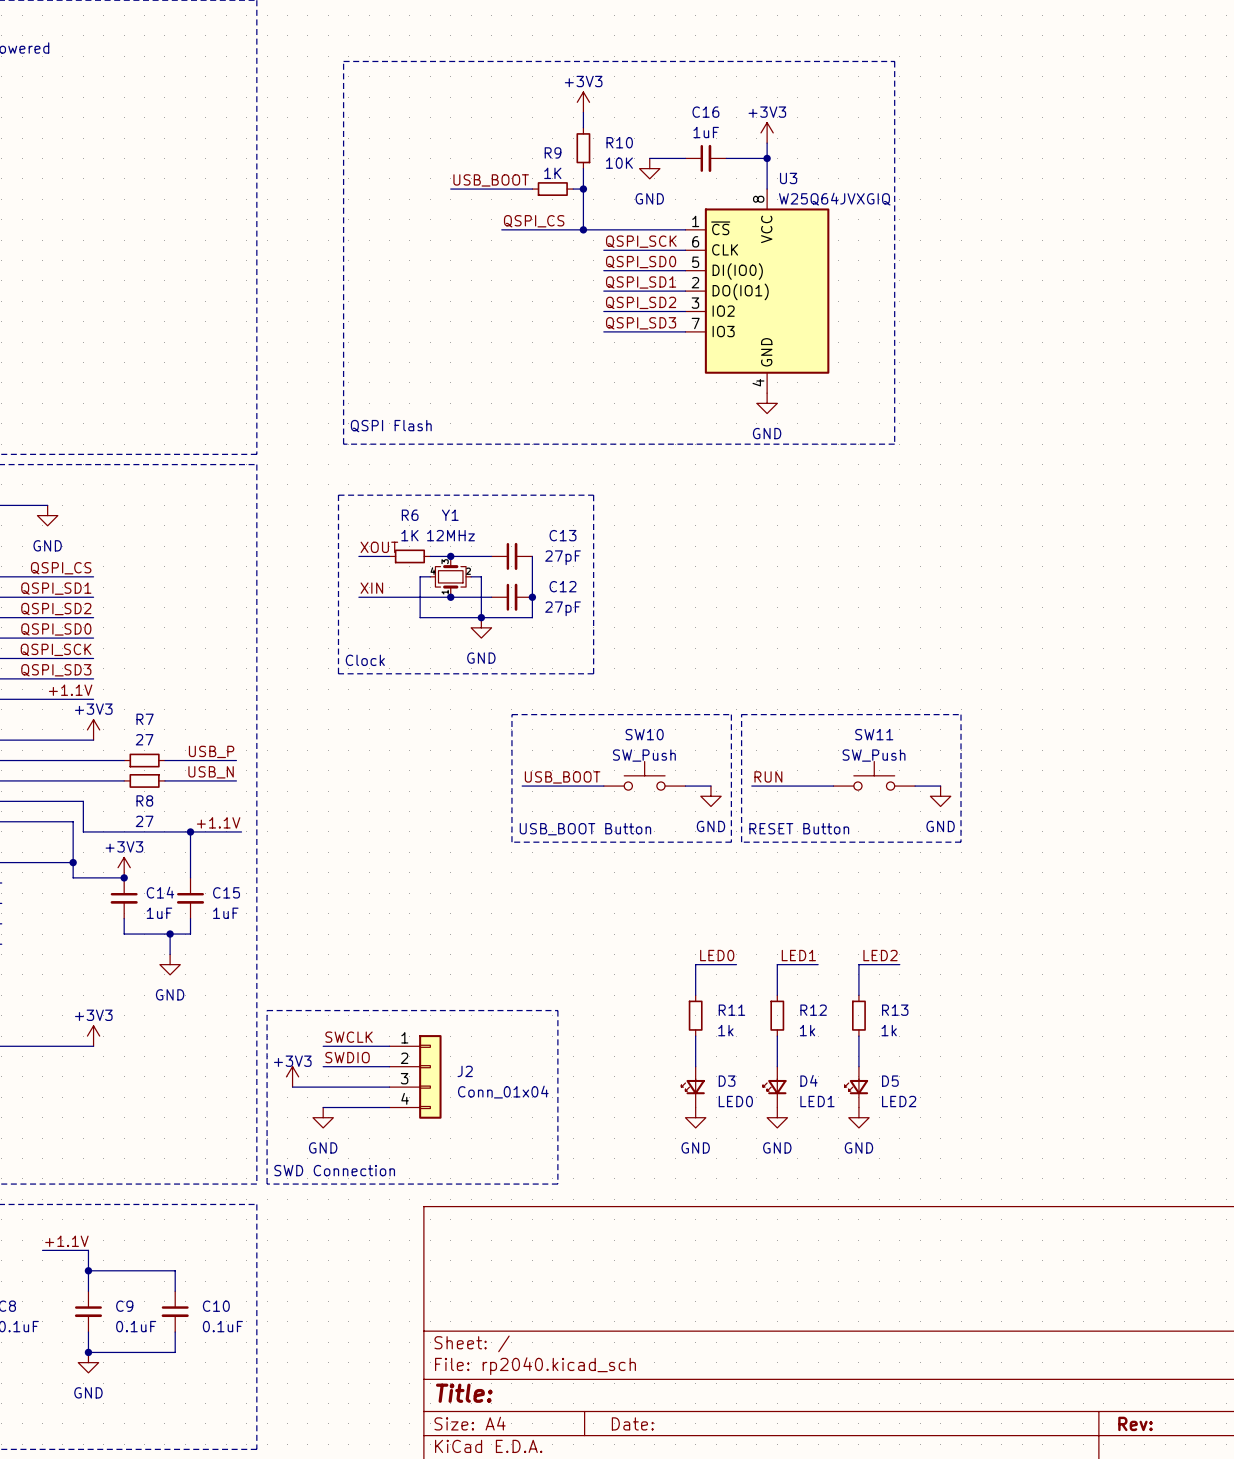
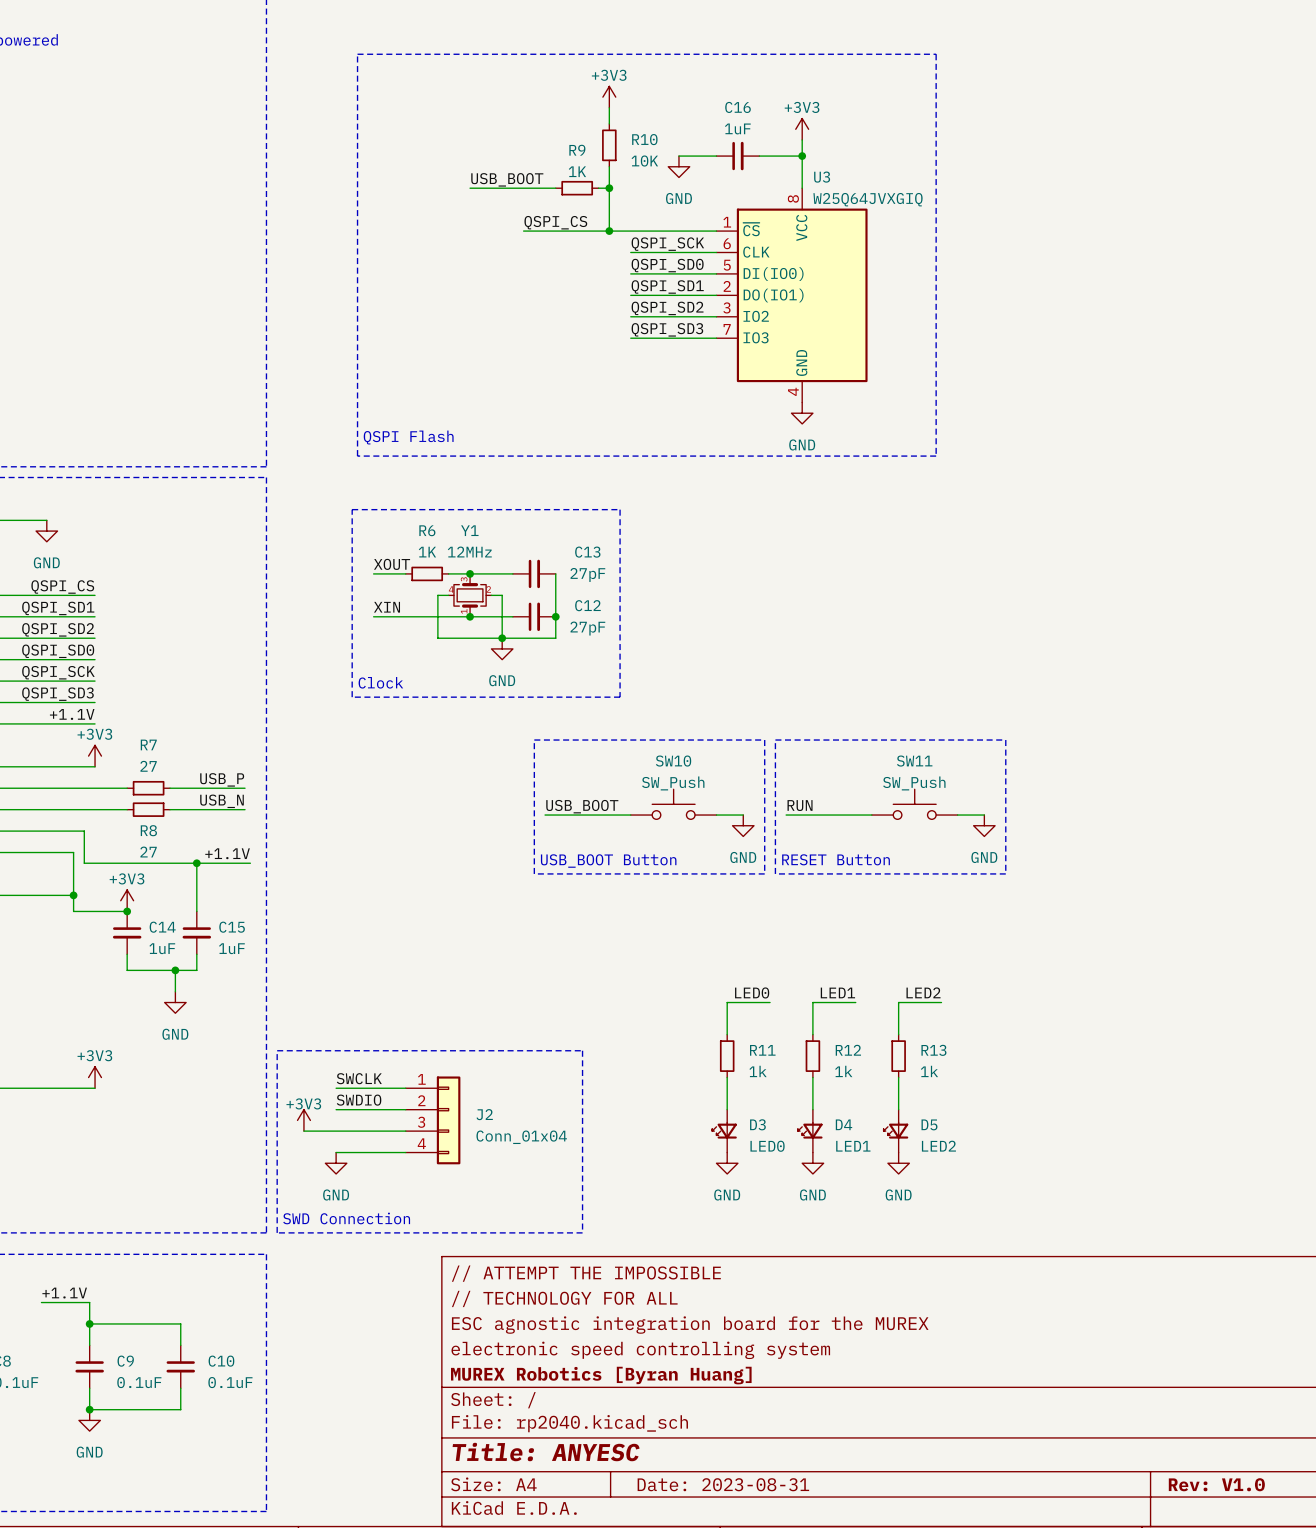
title block: none -> // ATTEMPT THE IMPOSSIBLE (586, 1273)
title block: none -> // TECHNOLOGY FOR ALL (564, 1298)
title block: none -> ESC agnostic integration board for the MUREX (690, 1325)
title block: none -> electronic speed controlling system (640, 1350)
title block: none -> MUREX Robotics [Byran Huang] (601, 1375)
title block: Title: (464, 1393) -> Title: ANYESC (546, 1452)
title block: Date: (632, 1423) -> Date: 2023-08-31 (723, 1484)
title block: Rev: (1135, 1423) -> Rev: V1.0 (1216, 1484)

